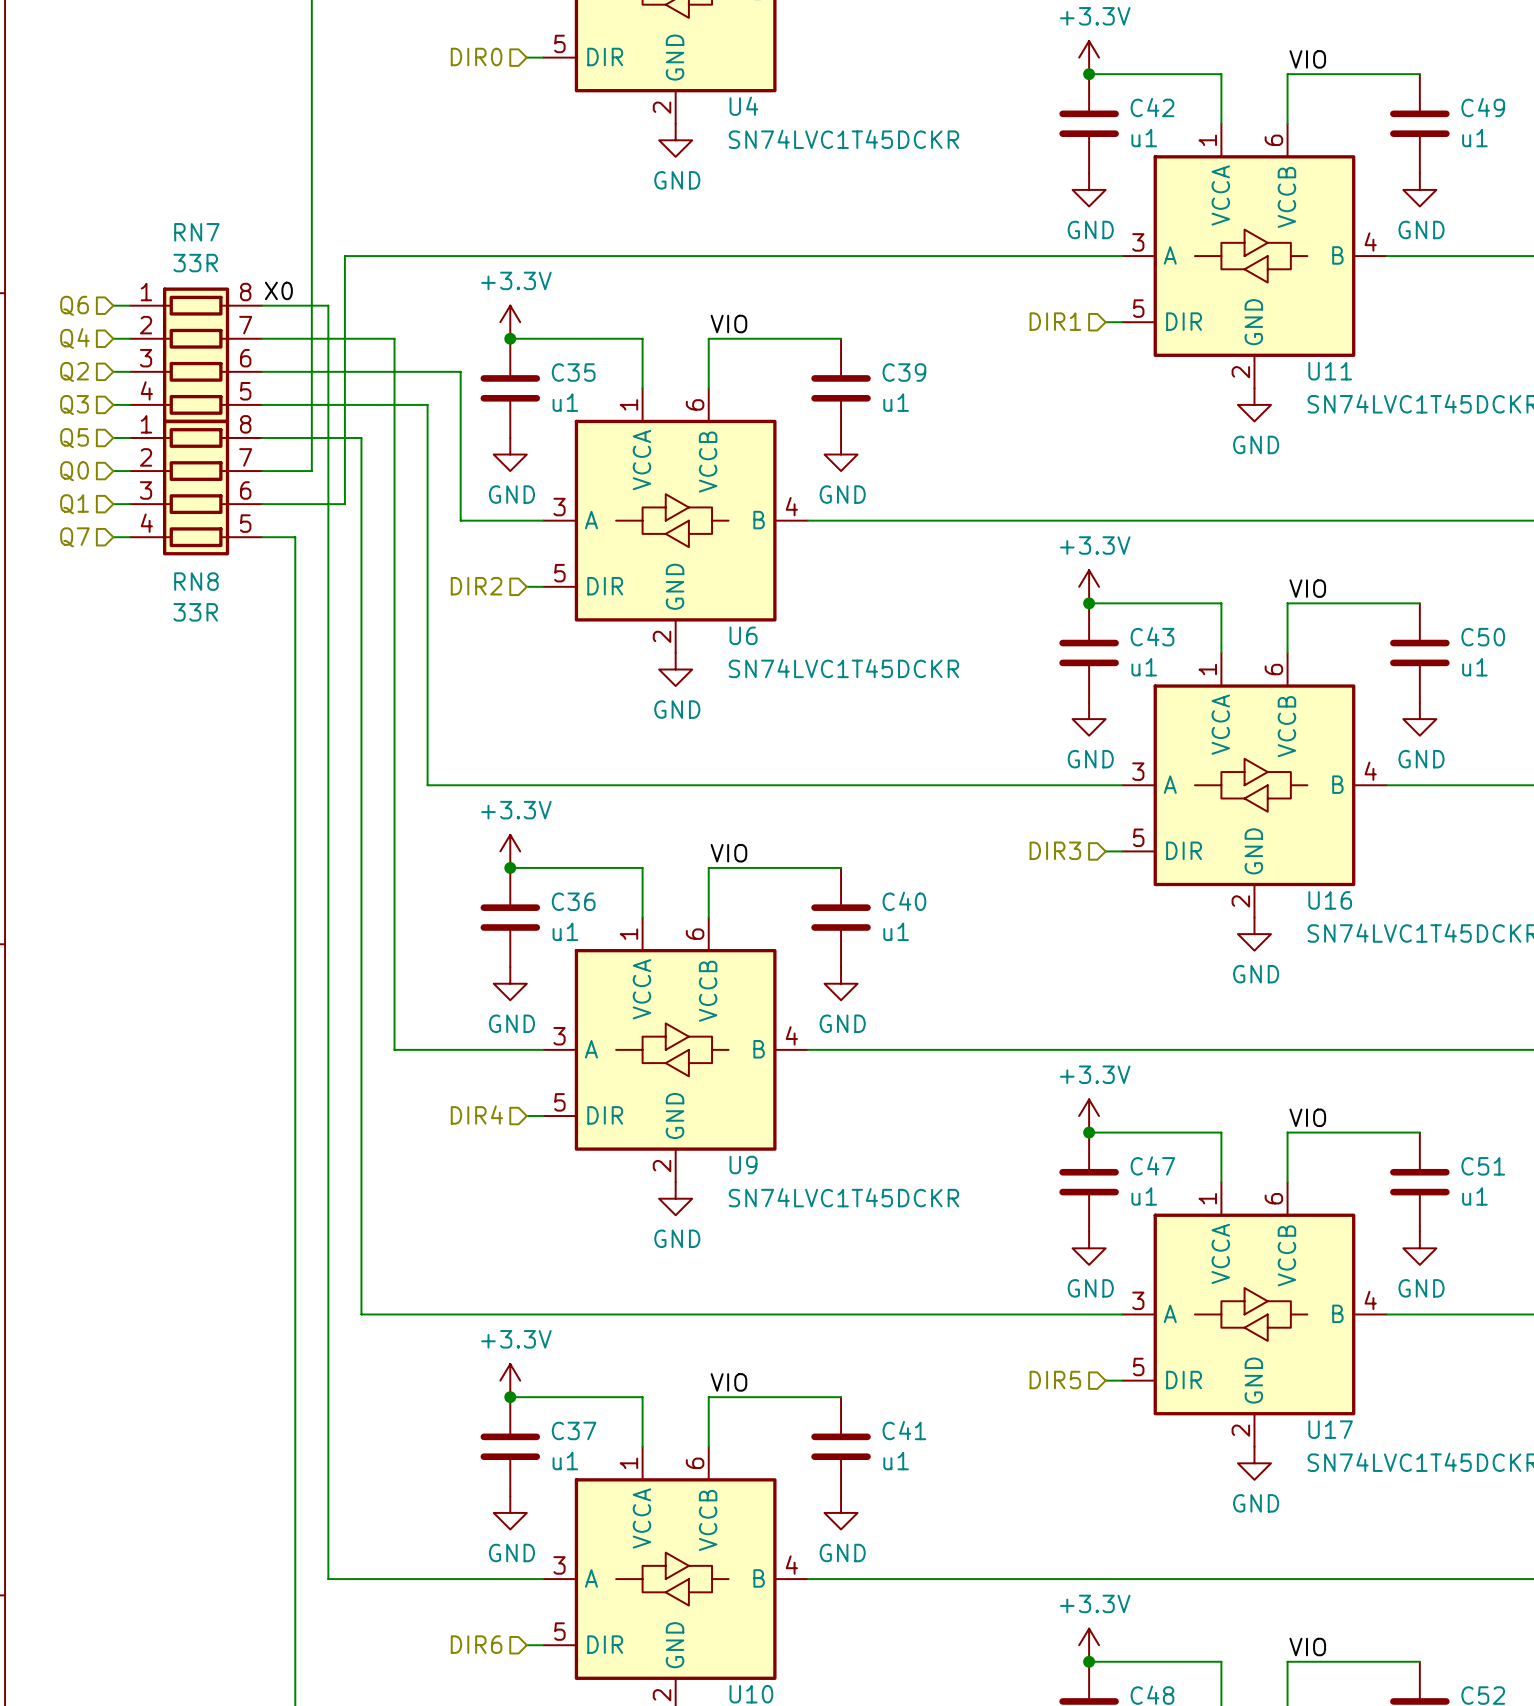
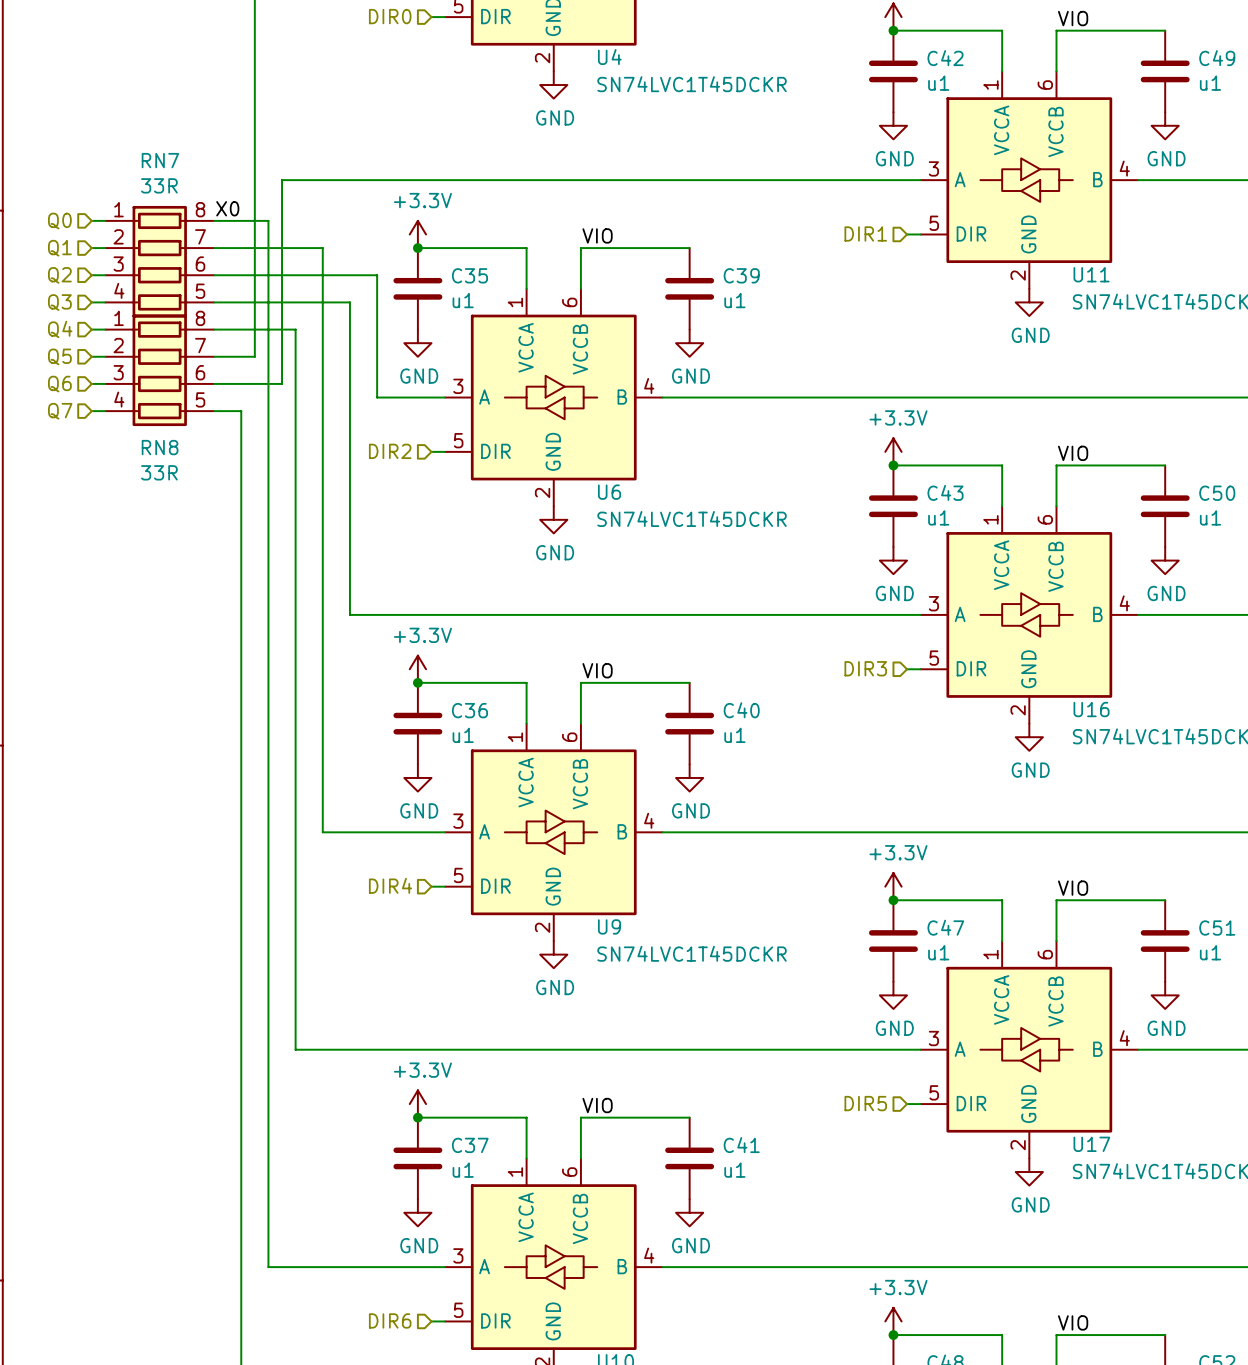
hierarchical label: Q6 (74, 305) -> Q0 (59, 221)
hierarchical label: Q4 (74, 338) -> Q1 (59, 248)
hierarchical label: Q5 (74, 438) -> Q4 (60, 329)
hierarchical label: Q0 (74, 471) -> Q5 (59, 356)
hierarchical label: Q1 (74, 504) -> Q6 (59, 384)

